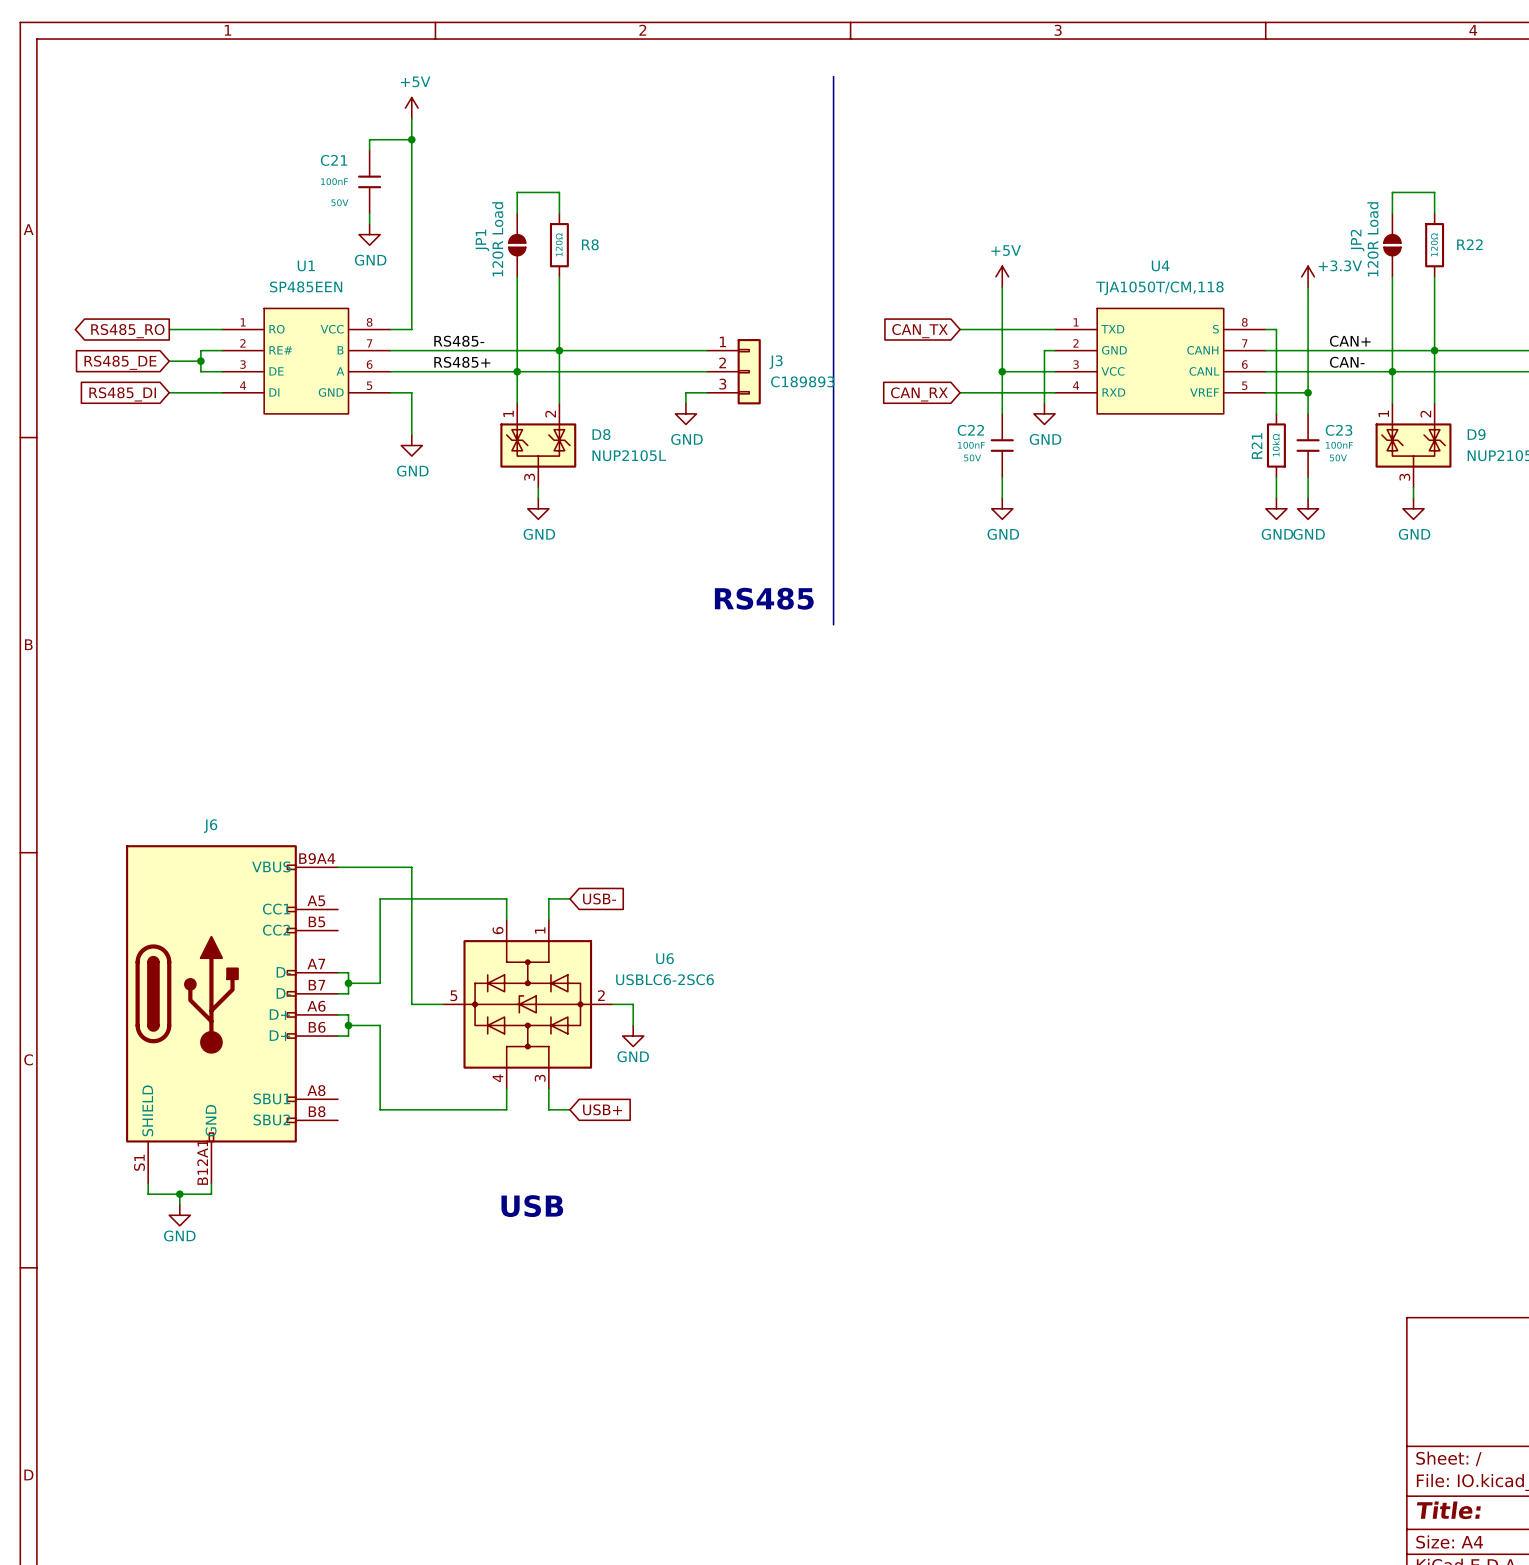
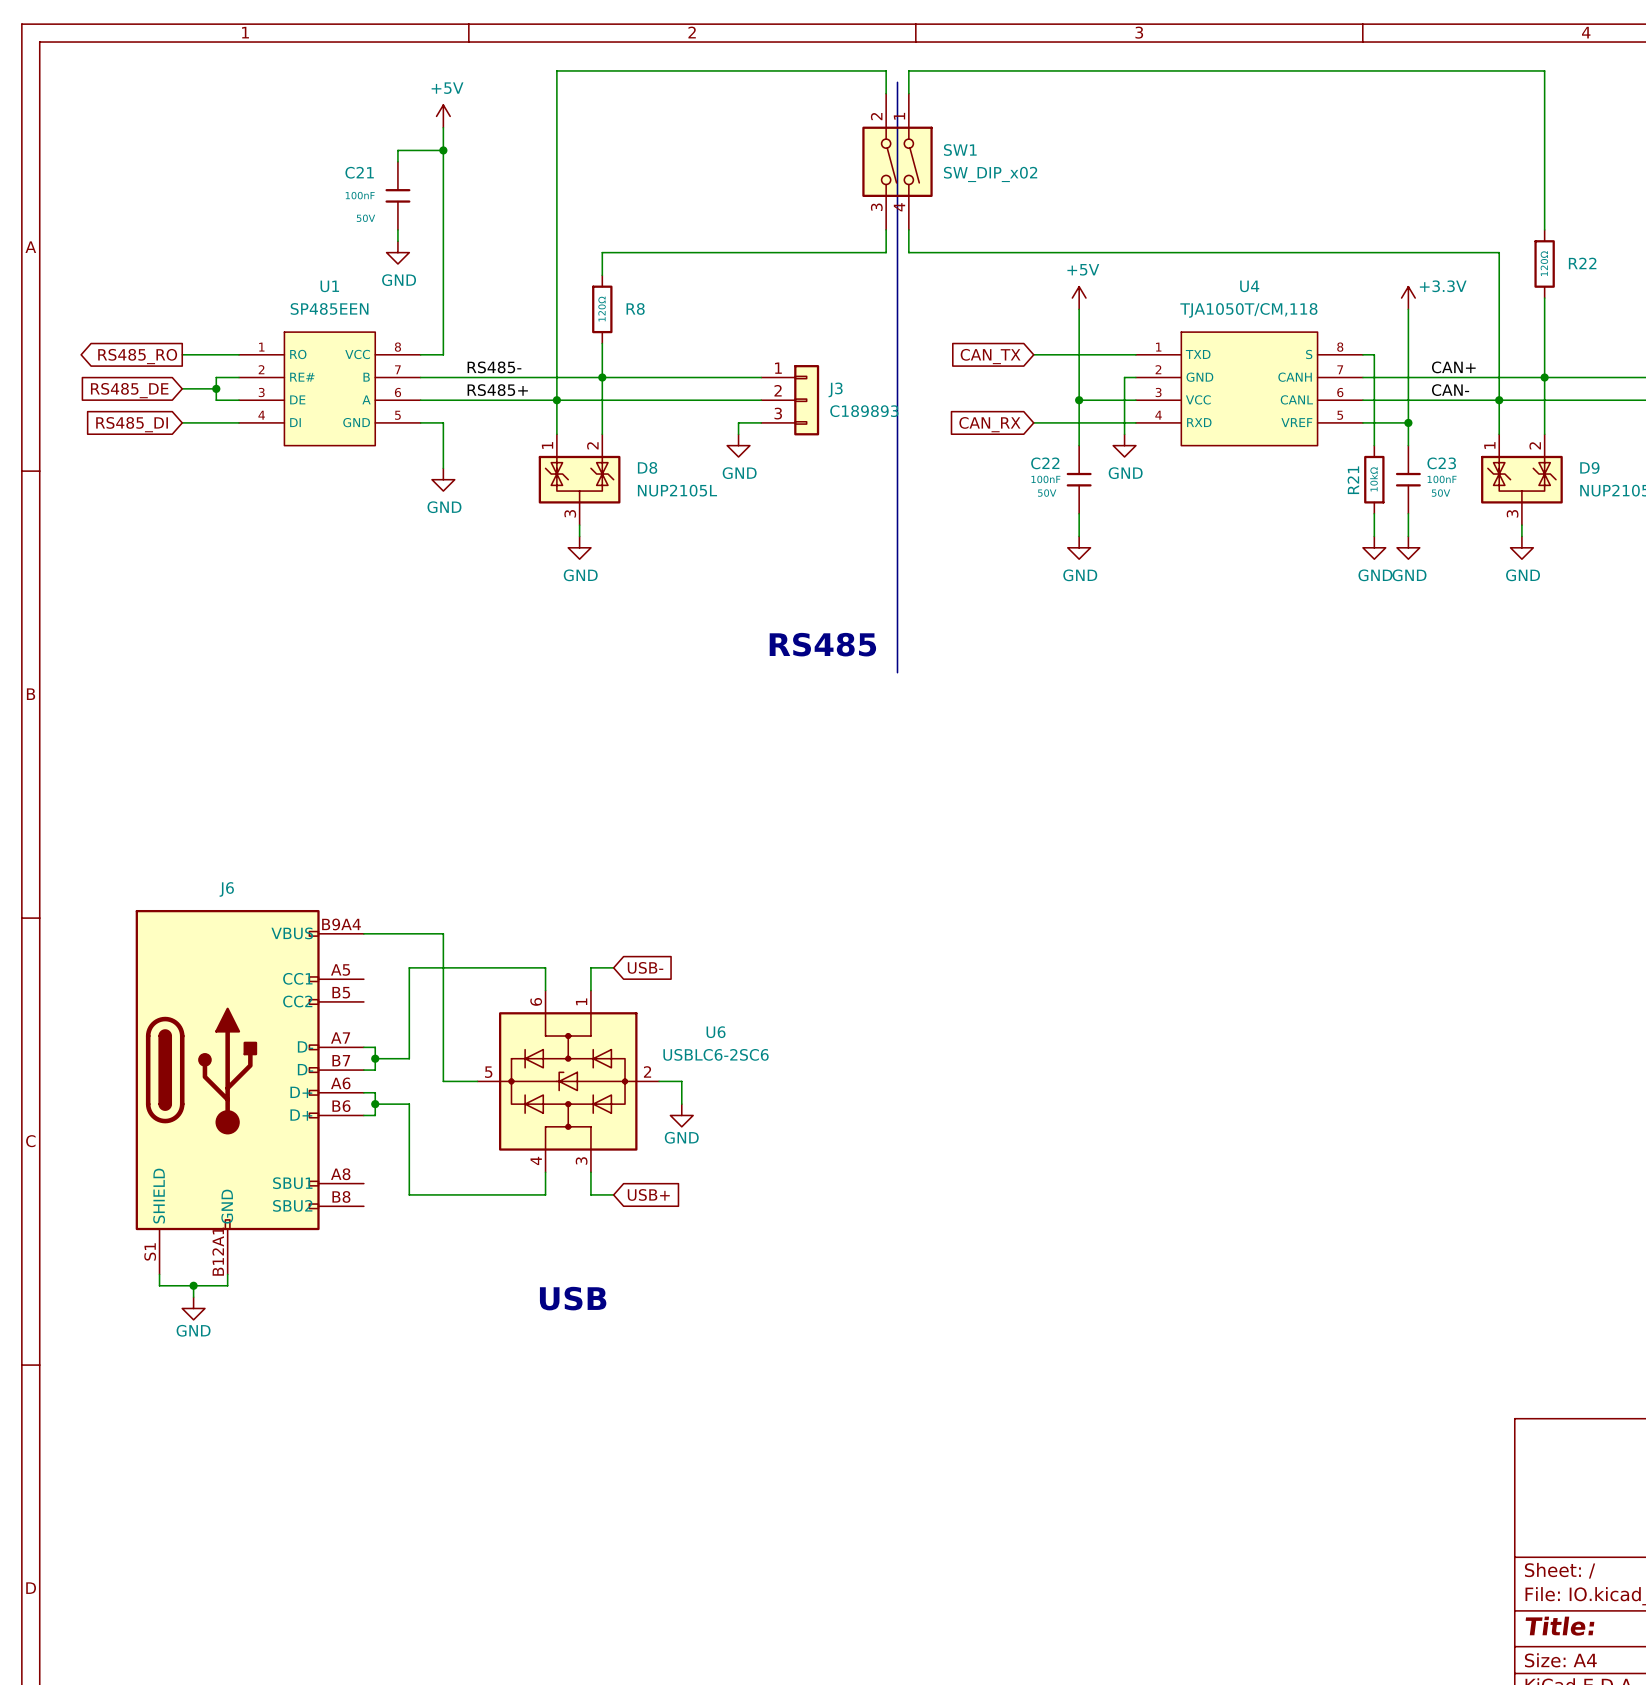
SW1: none -> SW_DIP_x02 (897, 161)
wire: (517, 192) (559, 192) (559, 213) -> (556, 207) (556, 70) (886, 70) (886, 93)
wire: (1434, 192) (1392, 192) (1392, 213) -> (1544, 207) (1544, 70) (908, 70) (908, 93)
wire: none -> (886, 229) (886, 252) (602, 252) (602, 275)
wire: none -> (908, 229) (908, 252) (1499, 252) (1499, 298)
JP1: 120R Load (517, 245) -> none
R8 position: (559, 245) -> (602, 309)
JP2: 120R Load (1392, 245) -> none
wire: (559, 276) (559, 318) -> none

